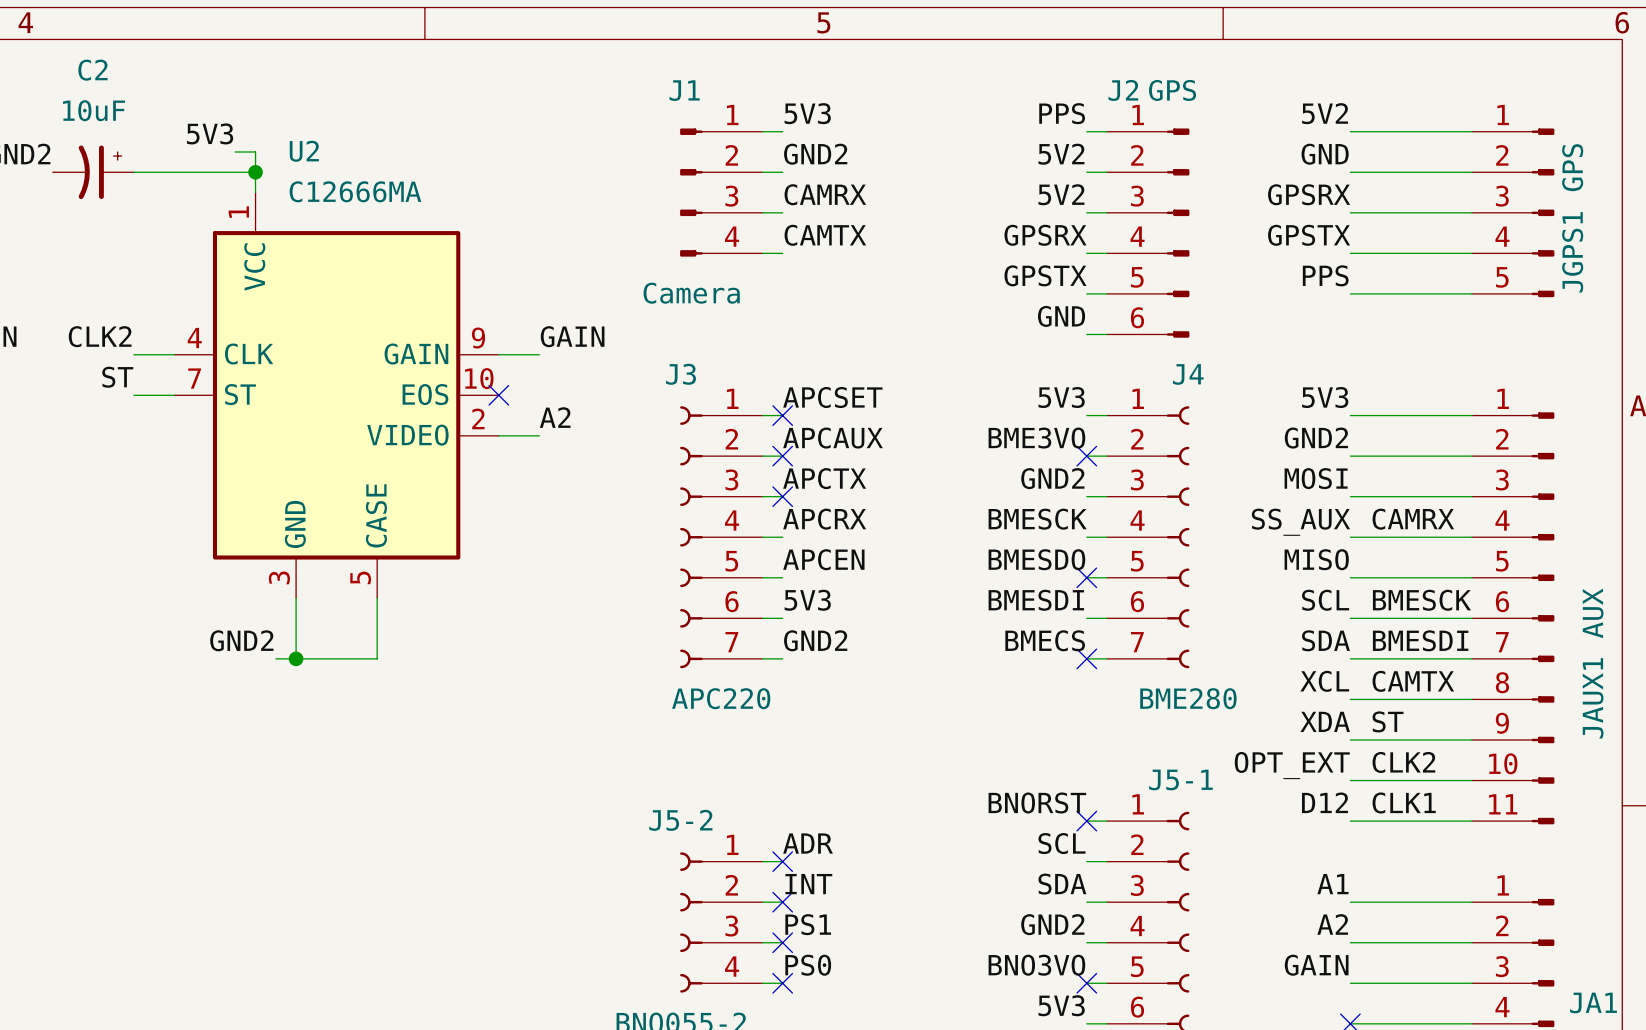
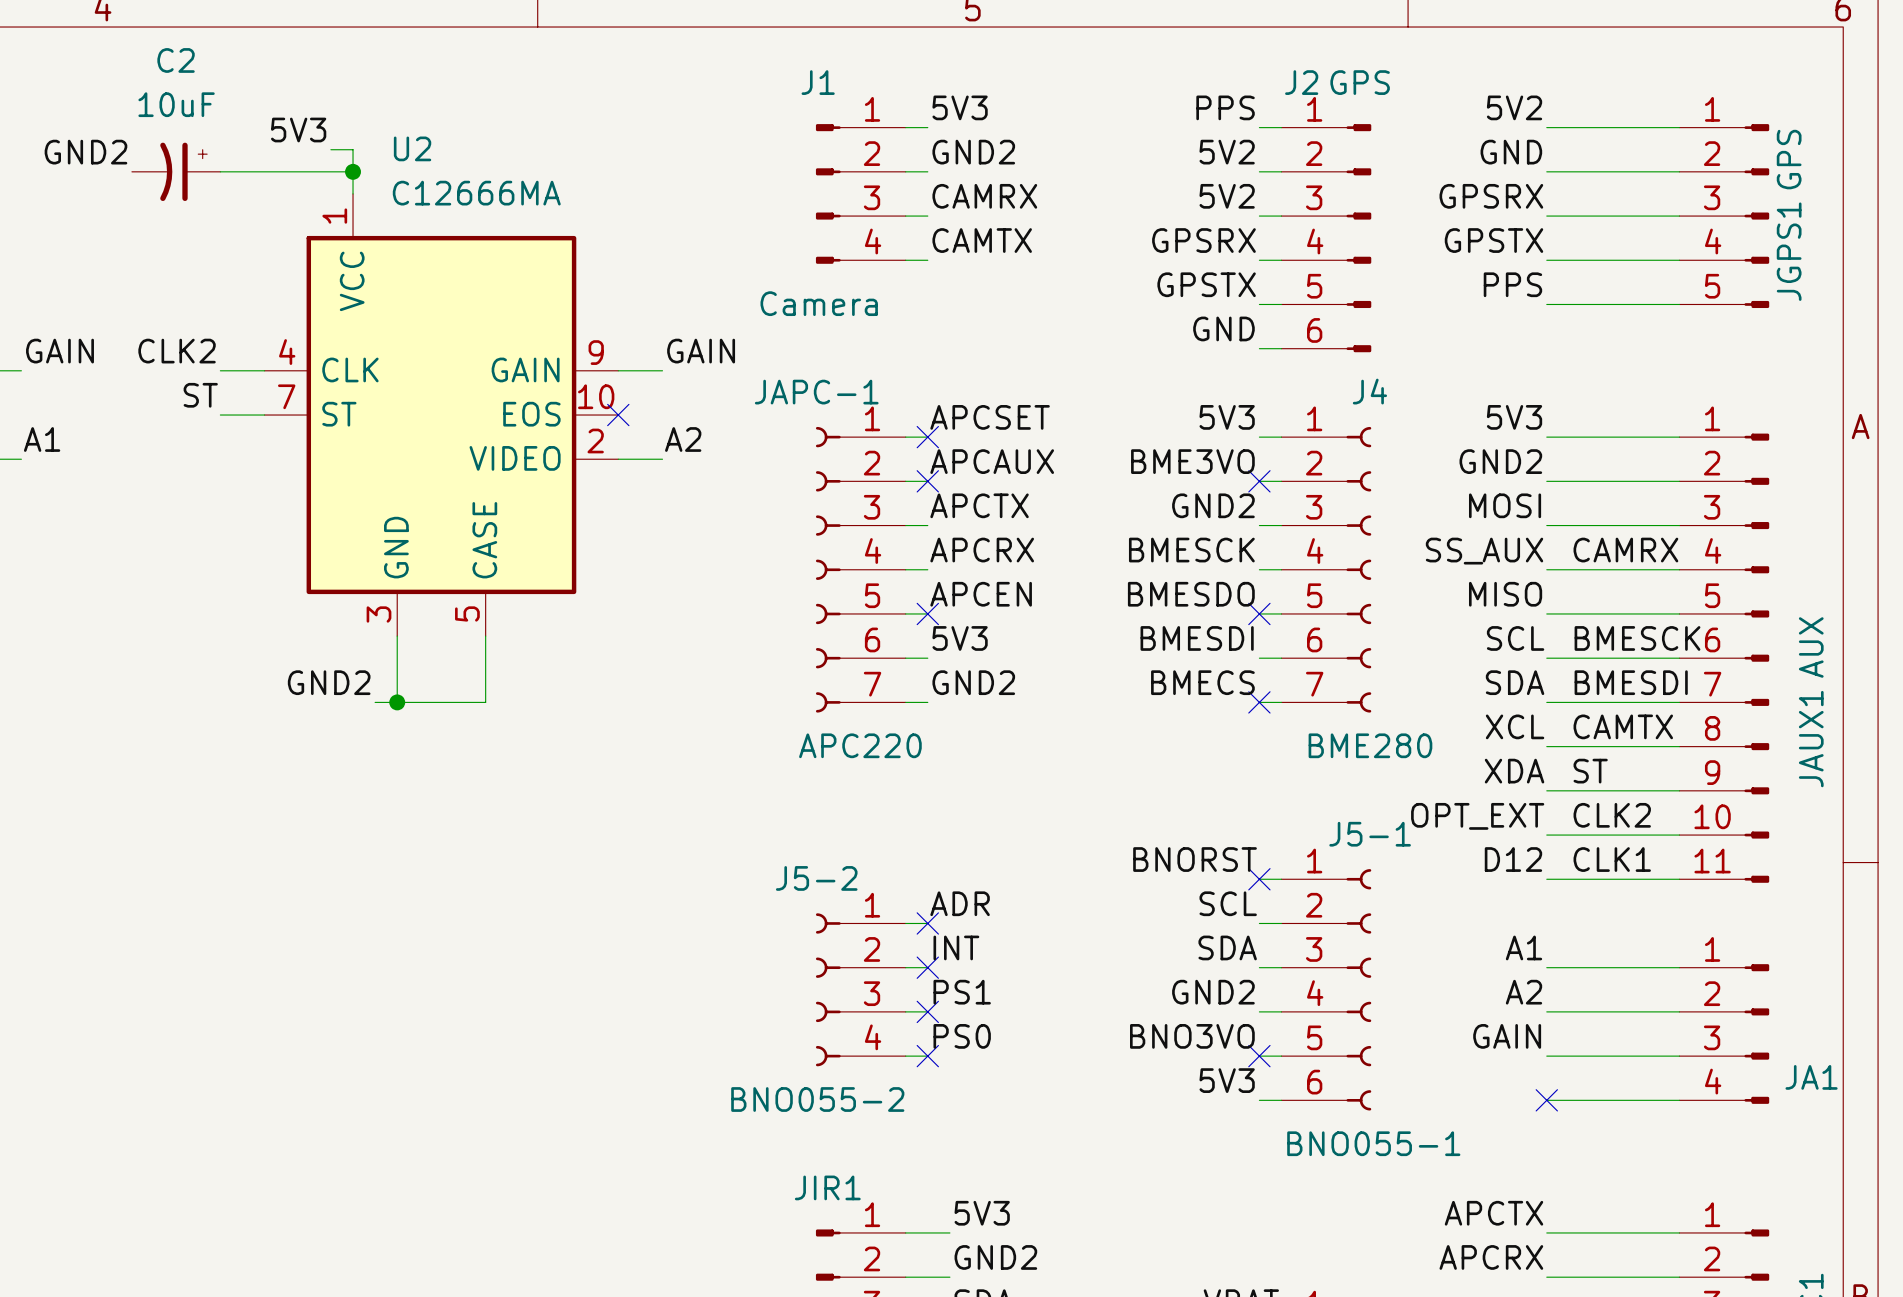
J3 name: J3 (681, 374) -> JAPC-1 (816, 392)
no-connect mark position: (782, 496) -> (927, 613)

